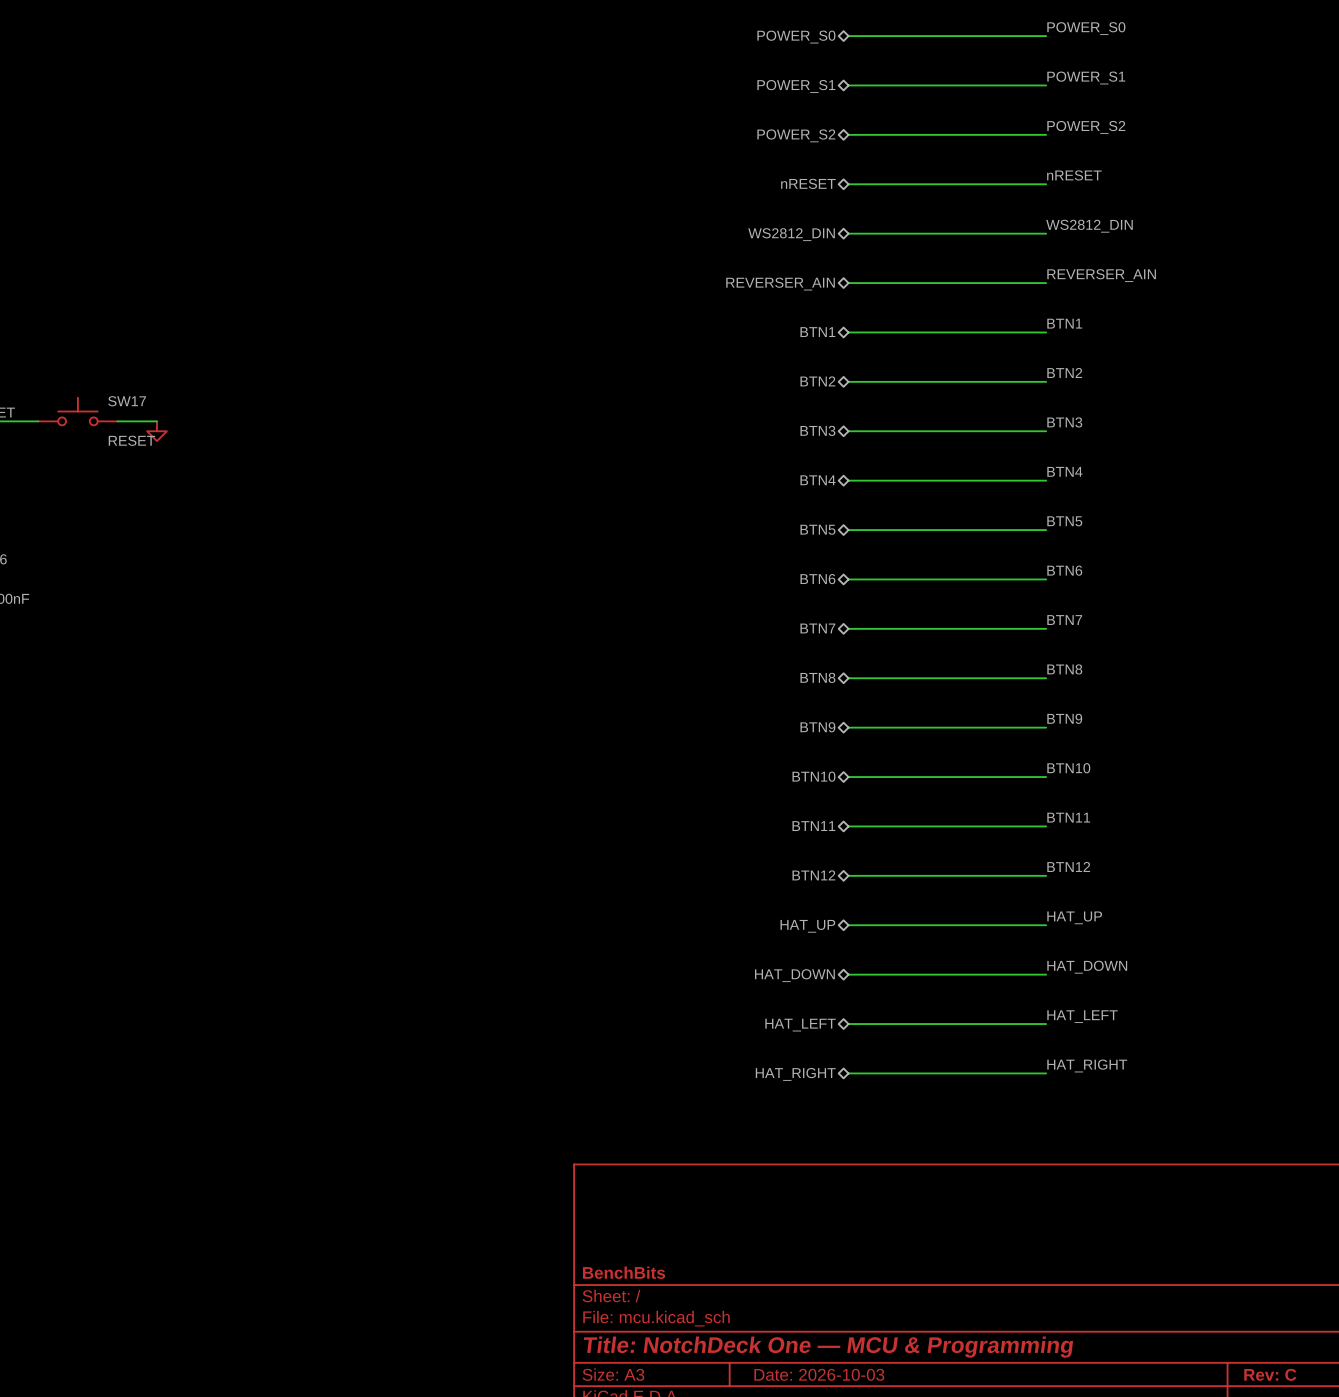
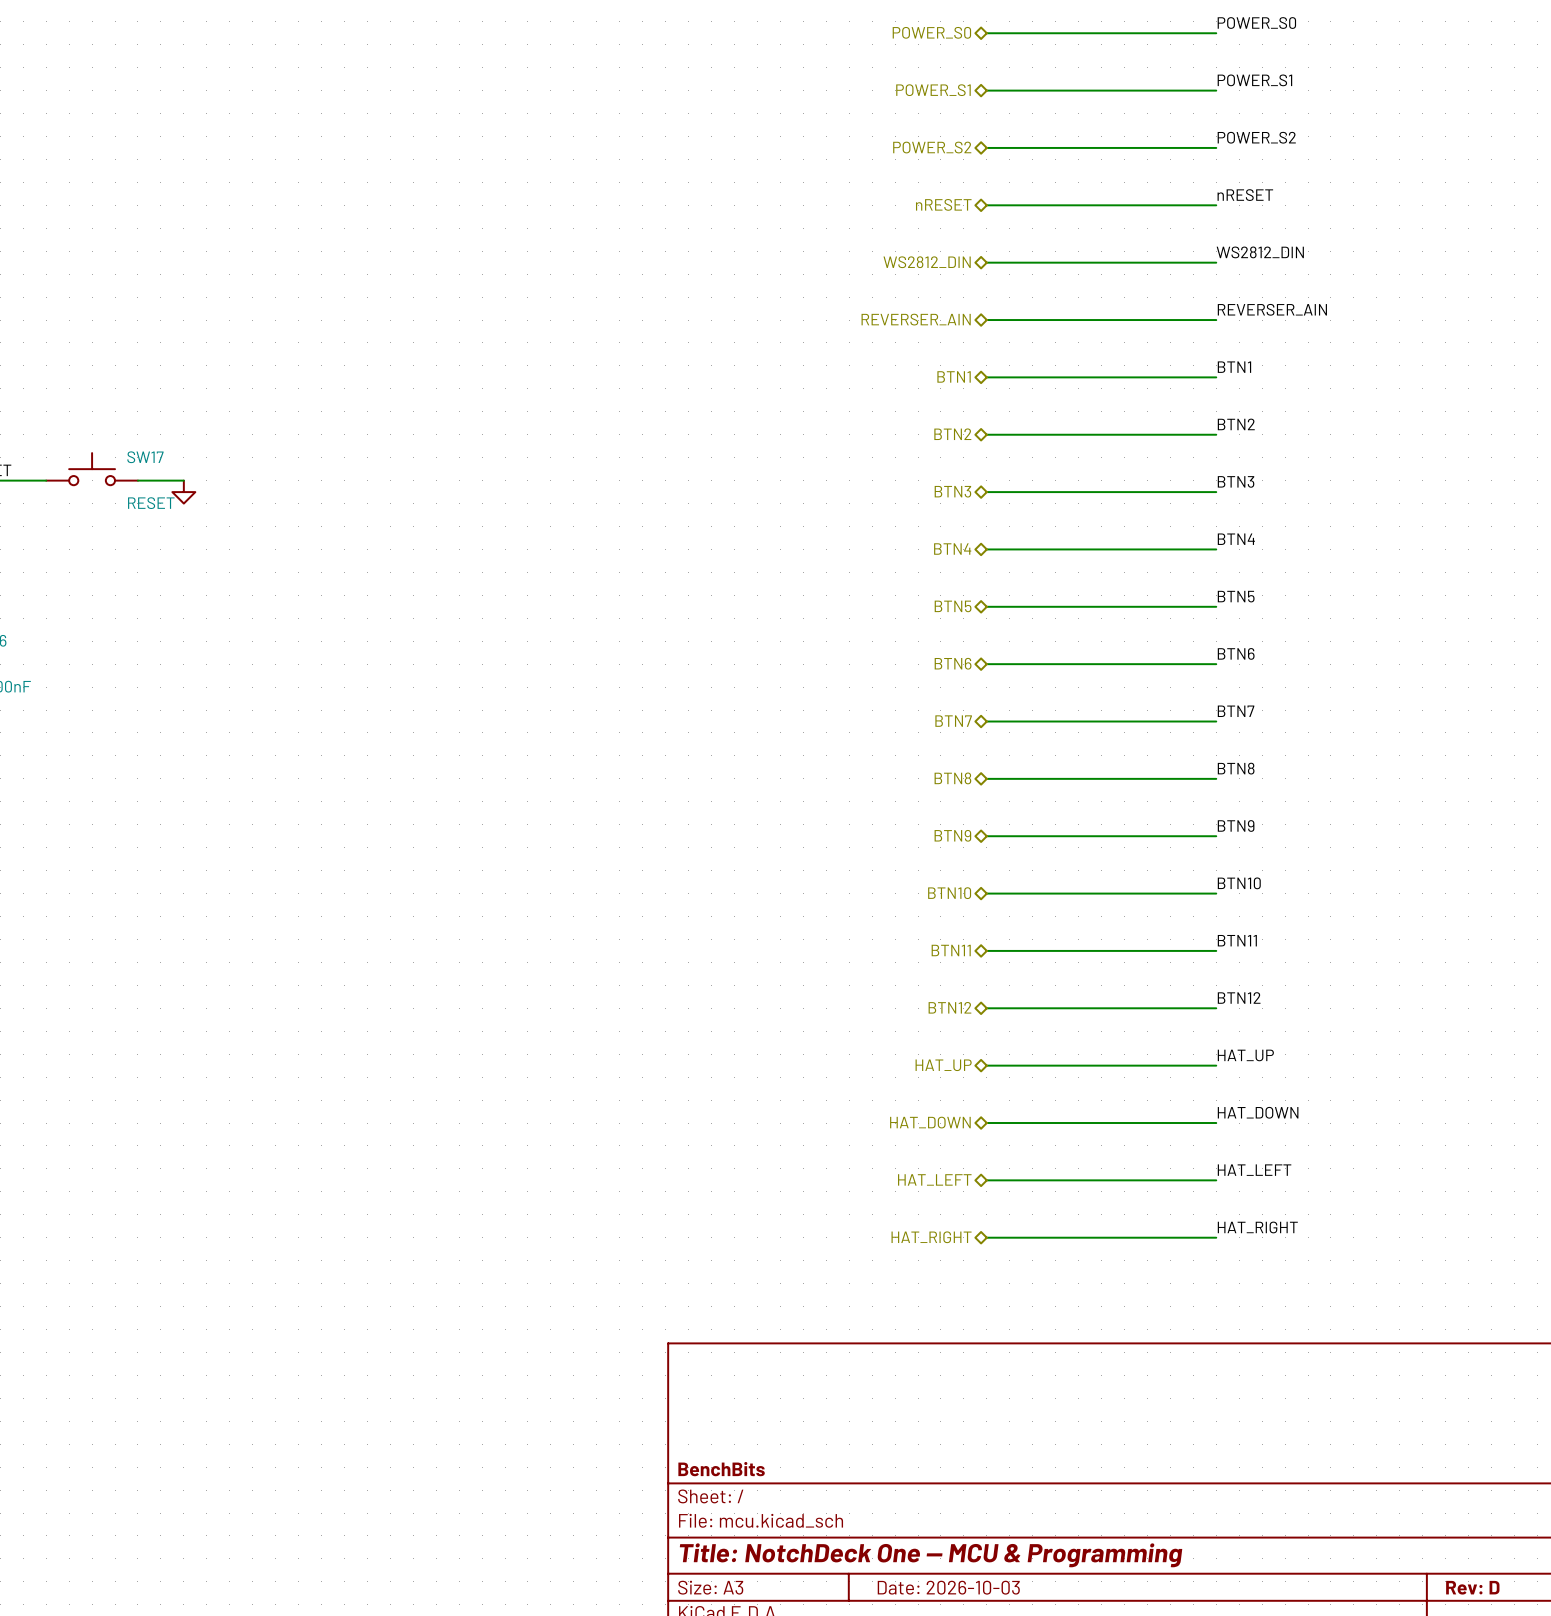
title block: Rev: C (1270, 1374) -> Rev: D (1472, 1587)

